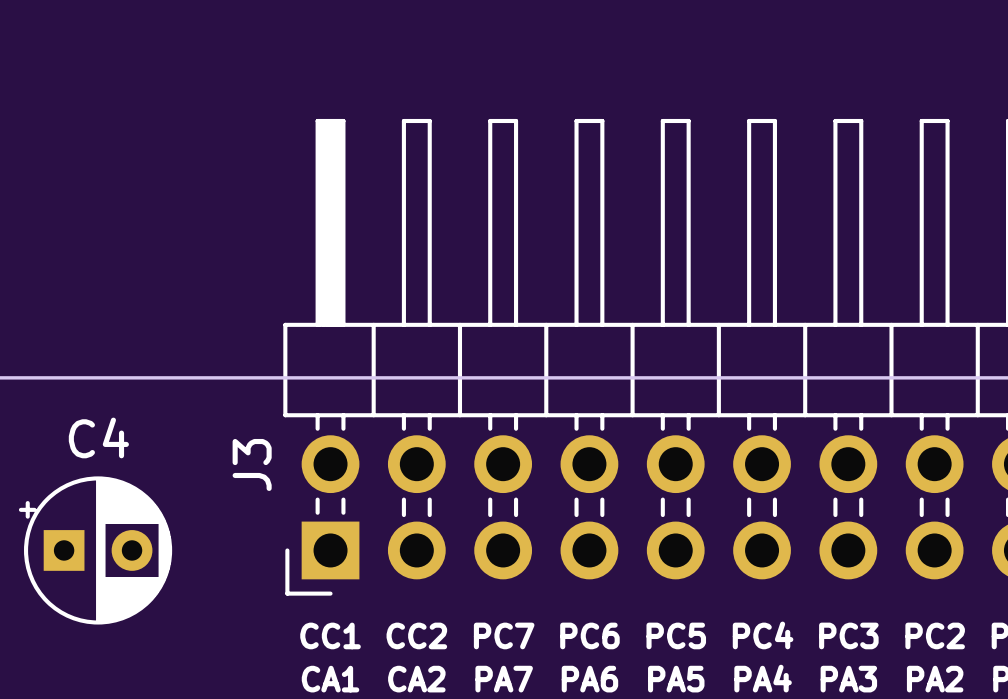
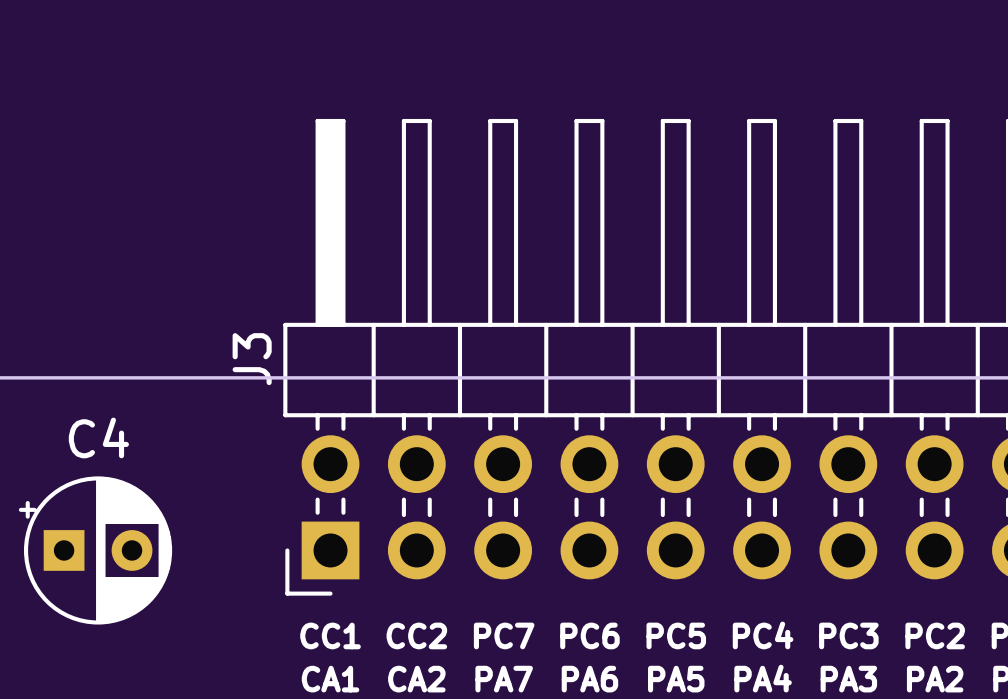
J3 name position: J3 (252, 464) -> J3 (252, 359)

